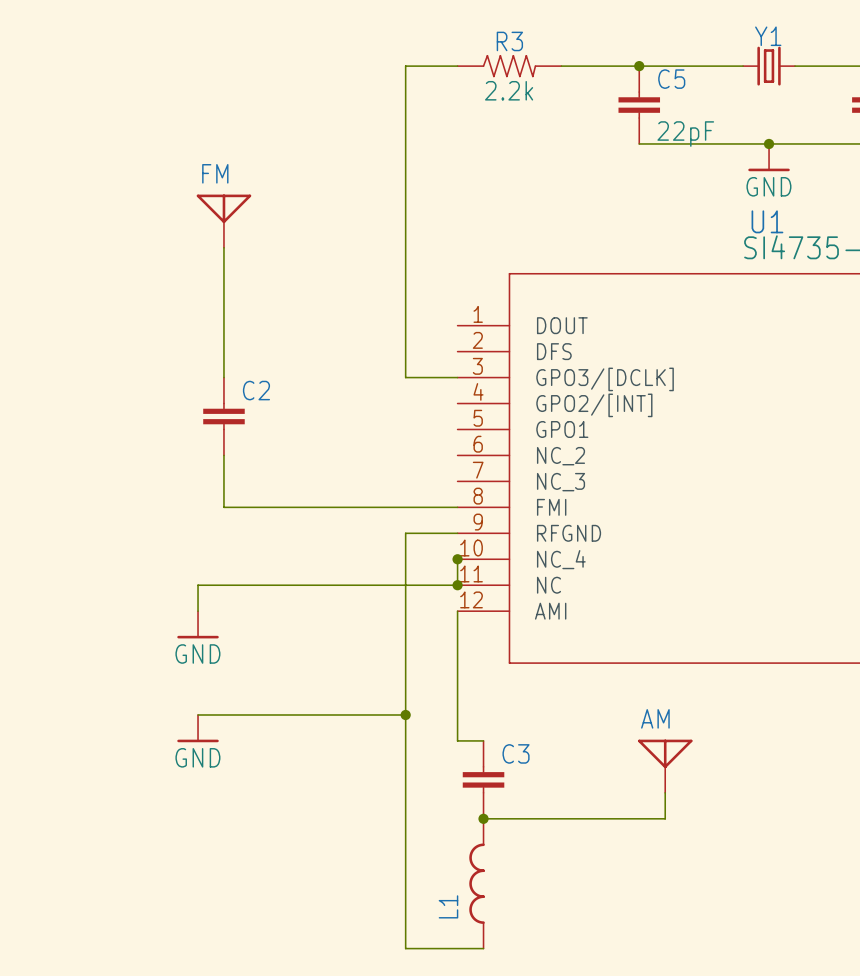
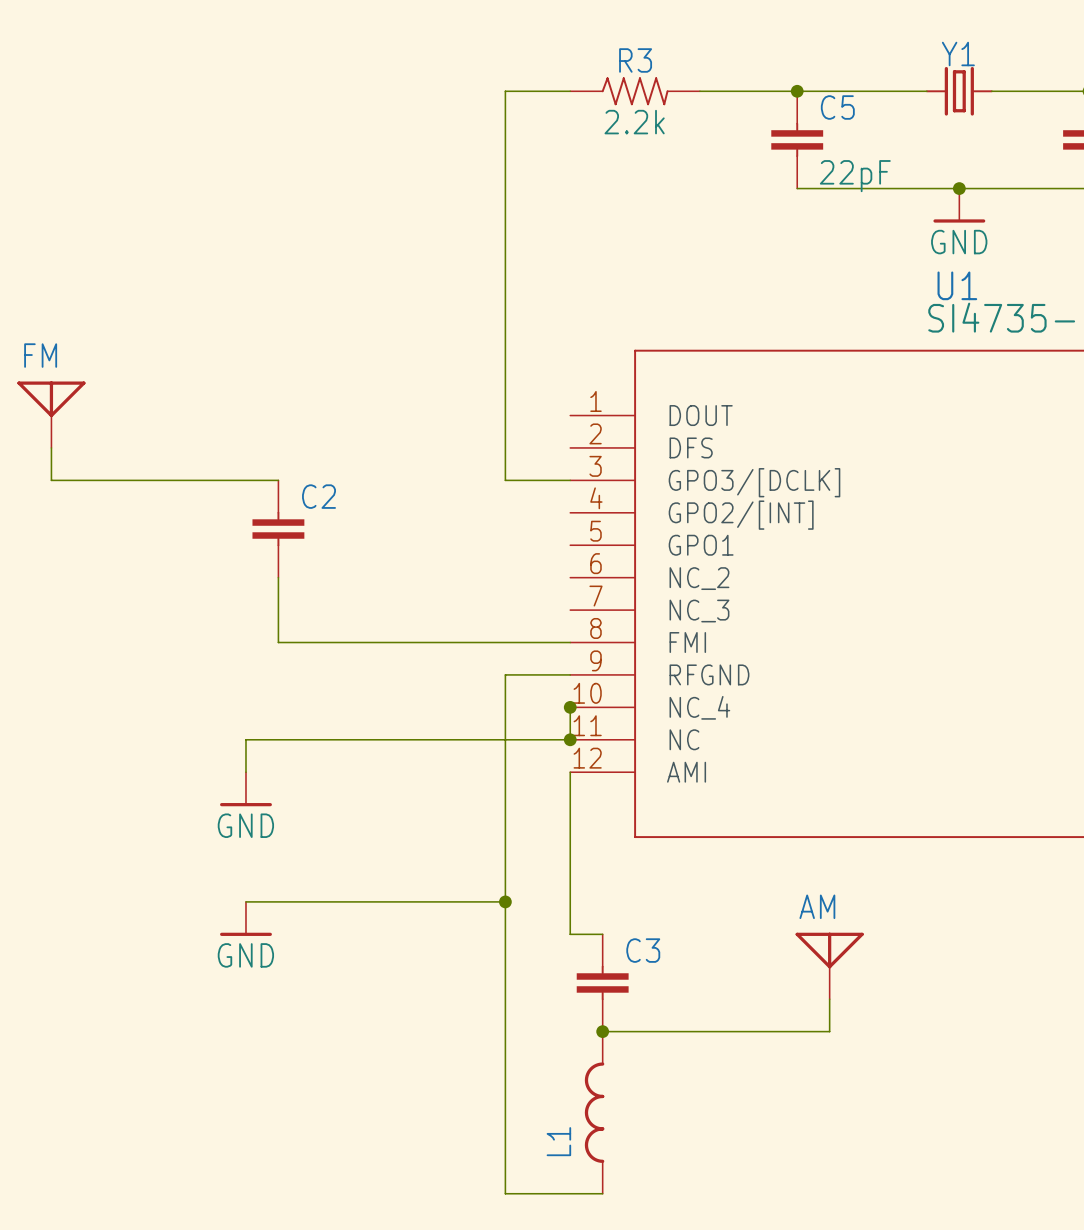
FM position: (223, 221) -> (51, 414)
wire: (223, 247) (223, 377) -> (51, 447) (51, 480) (278, 480)

